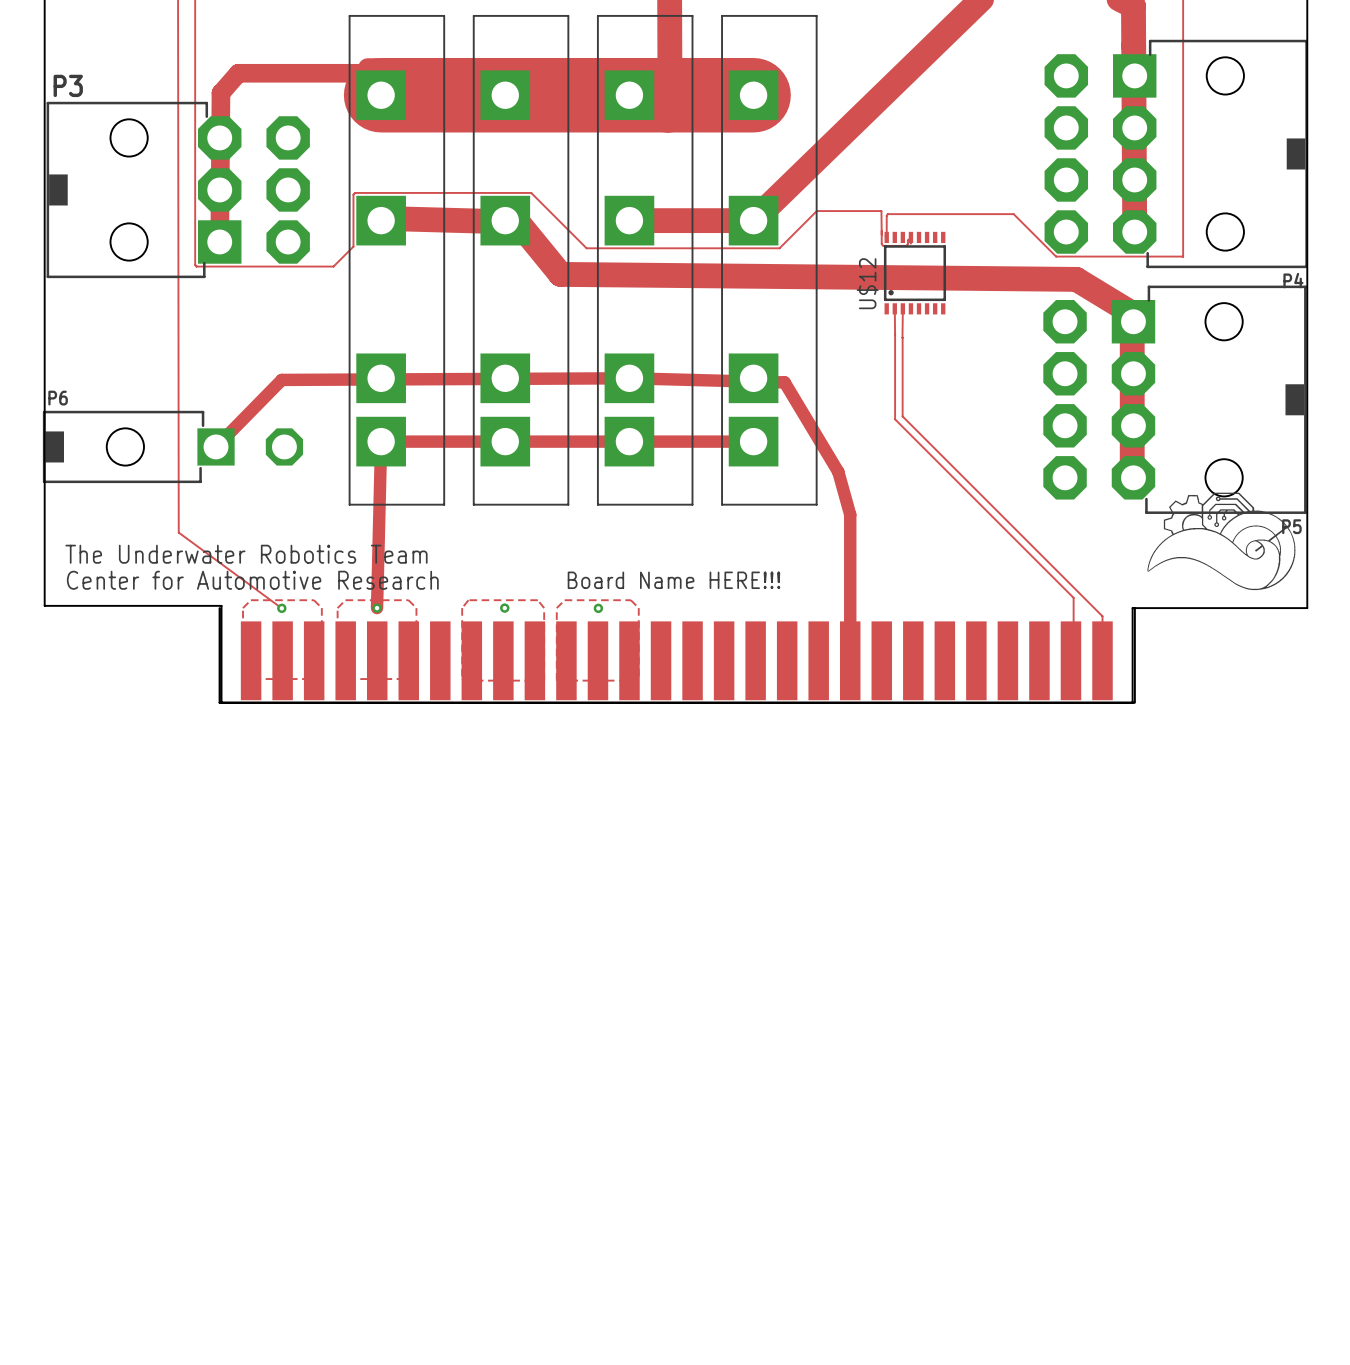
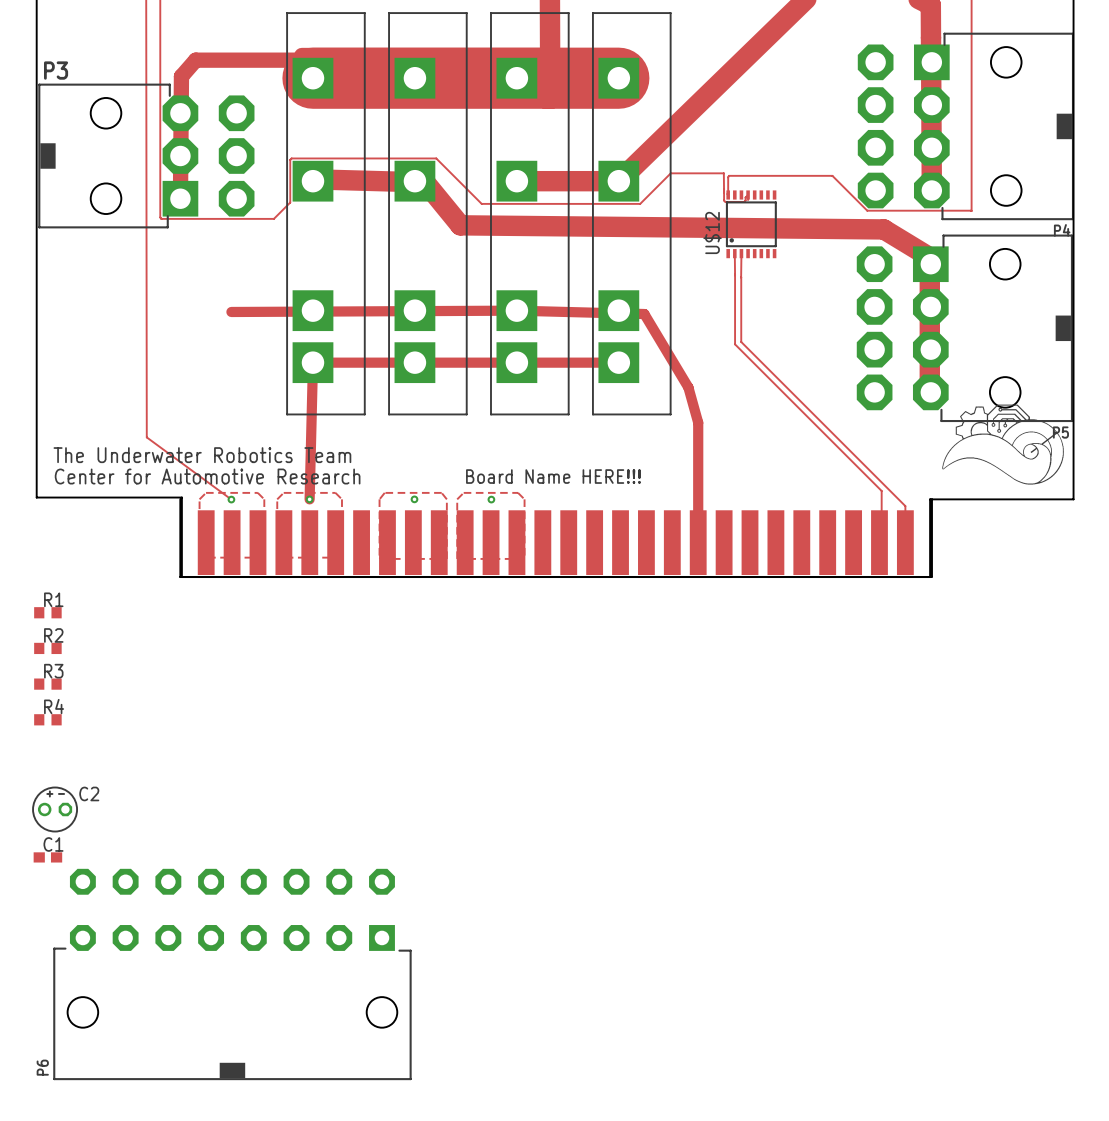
track: (281, 379) (216, 446) -> none
P6 name position: P6 (58, 398) -> P6 (42, 1067)
P6 footprint: [42, 410, 304, 484] -> [53, 868, 412, 1081]
R1: none -> (47, 612)
R2: none -> (47, 648)
R3: none -> (47, 684)
R4: none -> (47, 719)
C2: none -> (55, 809)
C1: none -> (47, 857)

